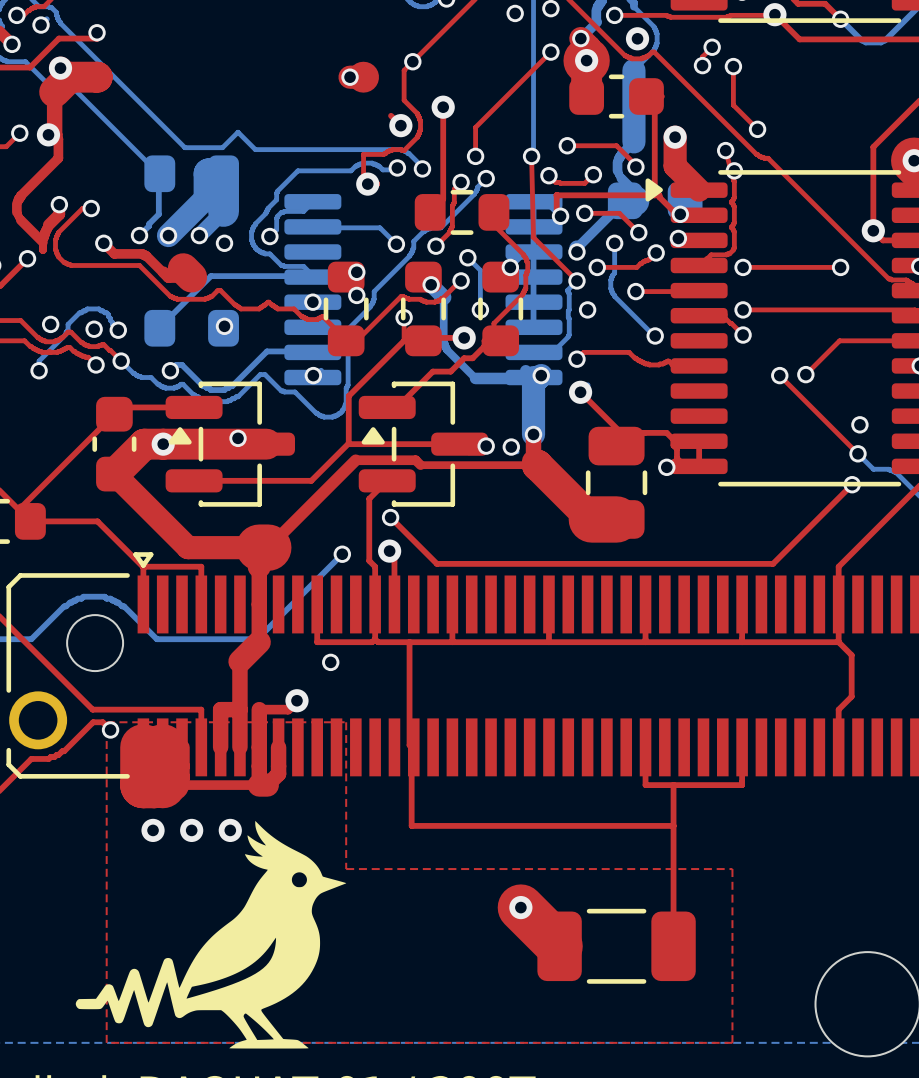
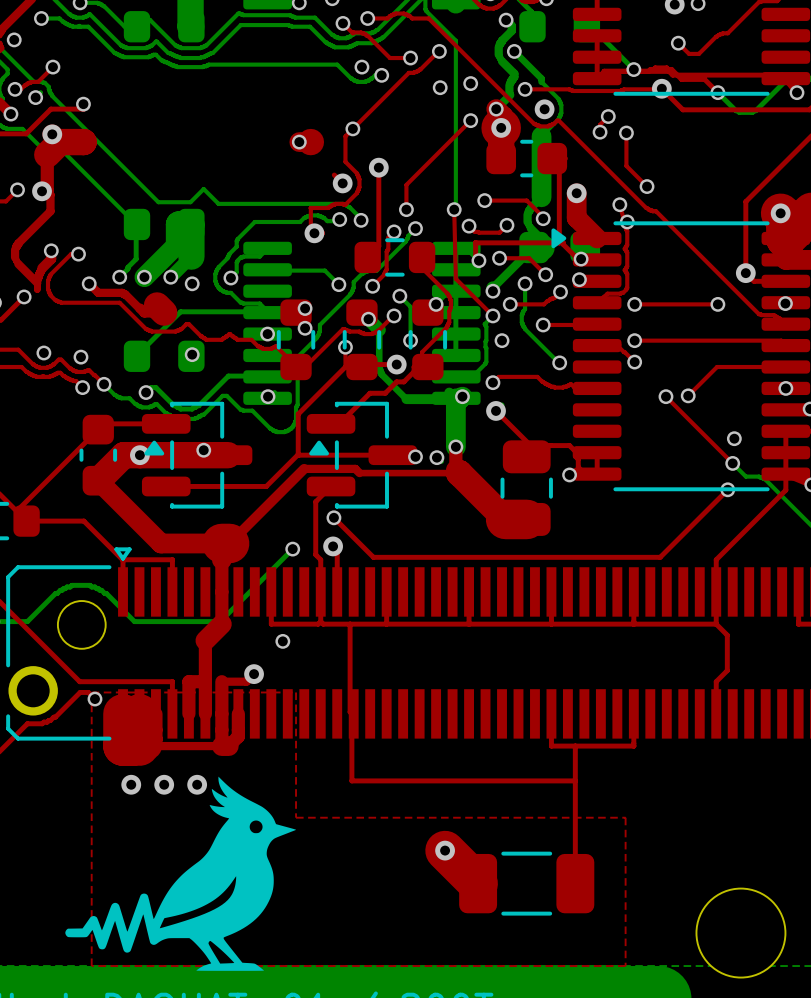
bottom track: (118, 330) (112, 324) (108, 314) (98, 308) (87, 308) (79, 312) (68, 324) (66, 334) (39, 361) (39, 370) -> none
via: (118, 330) -> none
via: (39, 370) -> none

